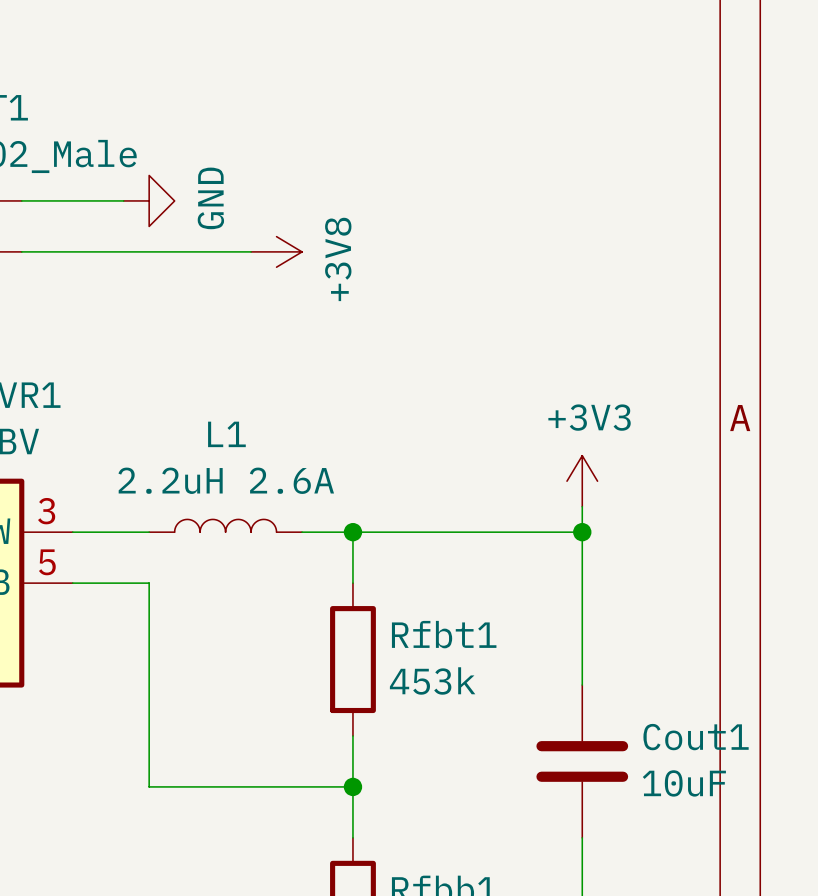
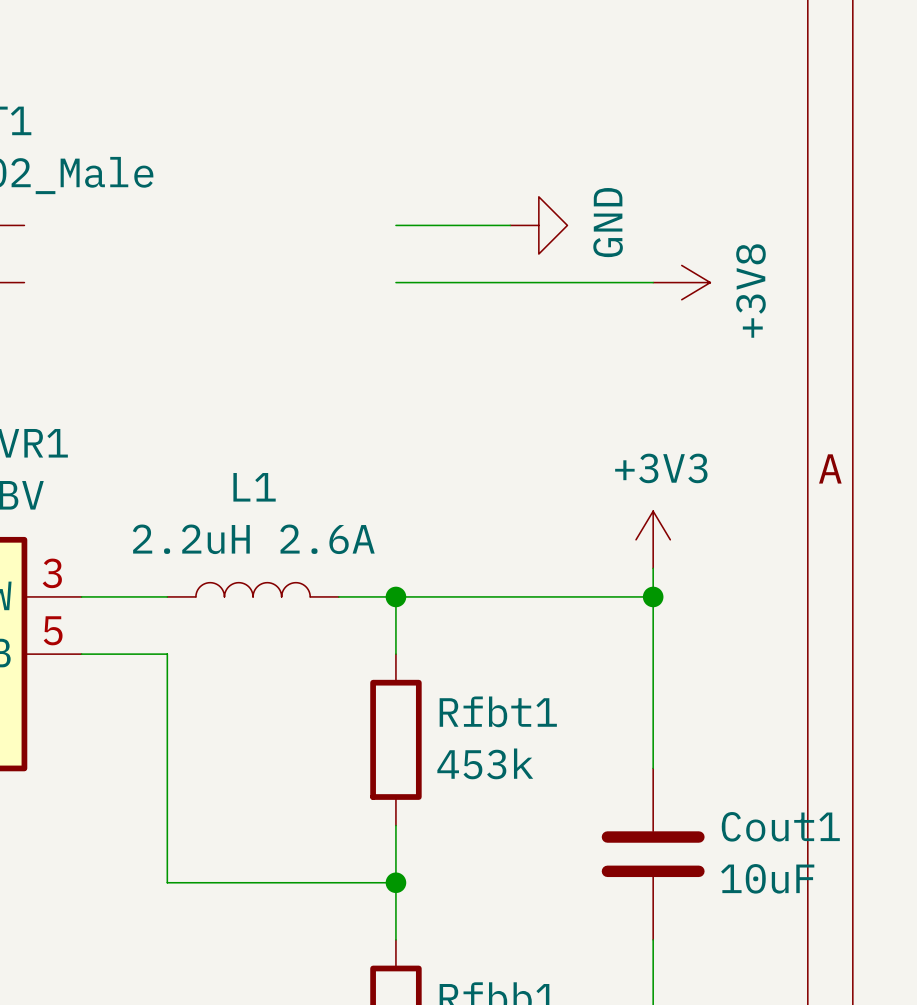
wire: (21, 200) (123, 200) -> (395, 225) (510, 225)
power symbol: GND (149, 200) -> none
power symbol: none -> GND (538, 225)
wire: (21, 251) (251, 251) -> (395, 282) (653, 282)
power symbol position: +3V8 (276, 251) -> +3V8 (681, 282)

